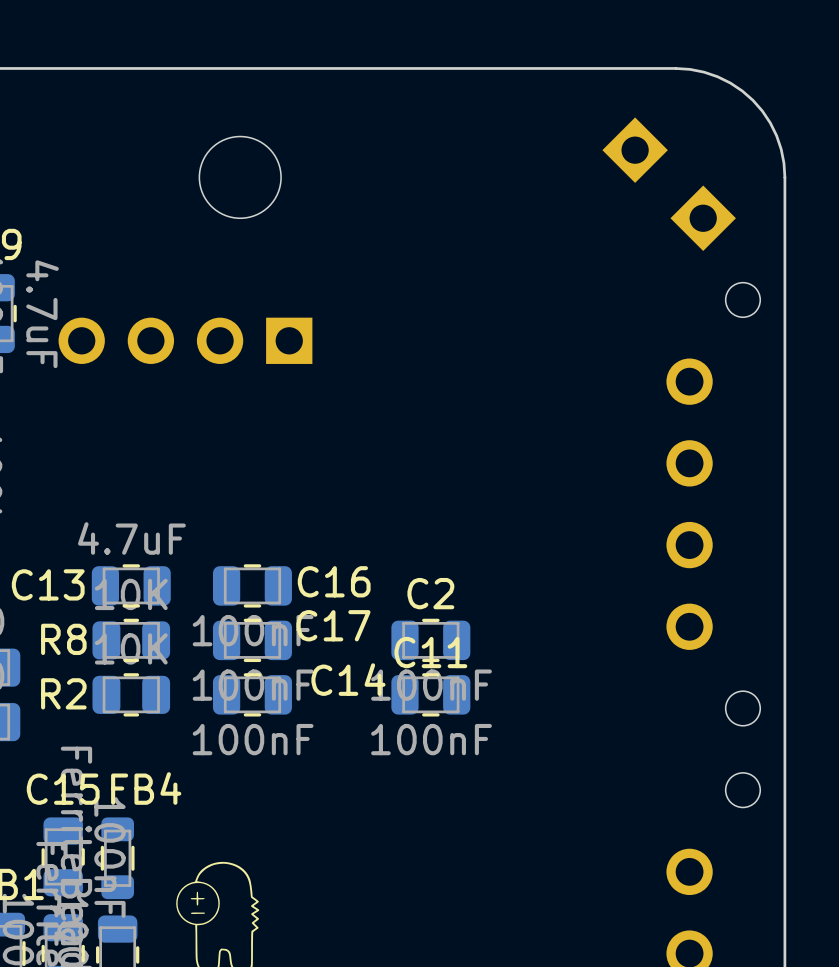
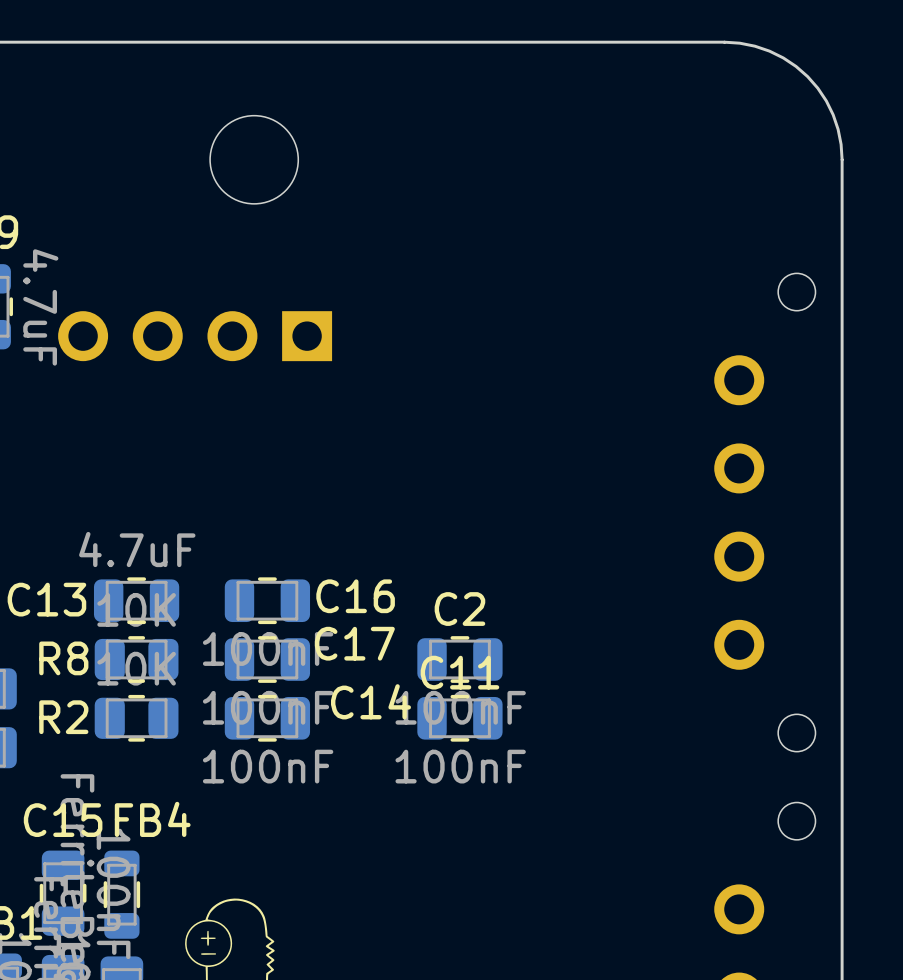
part: (635, 150) -> none
part: (703, 218) -> none

